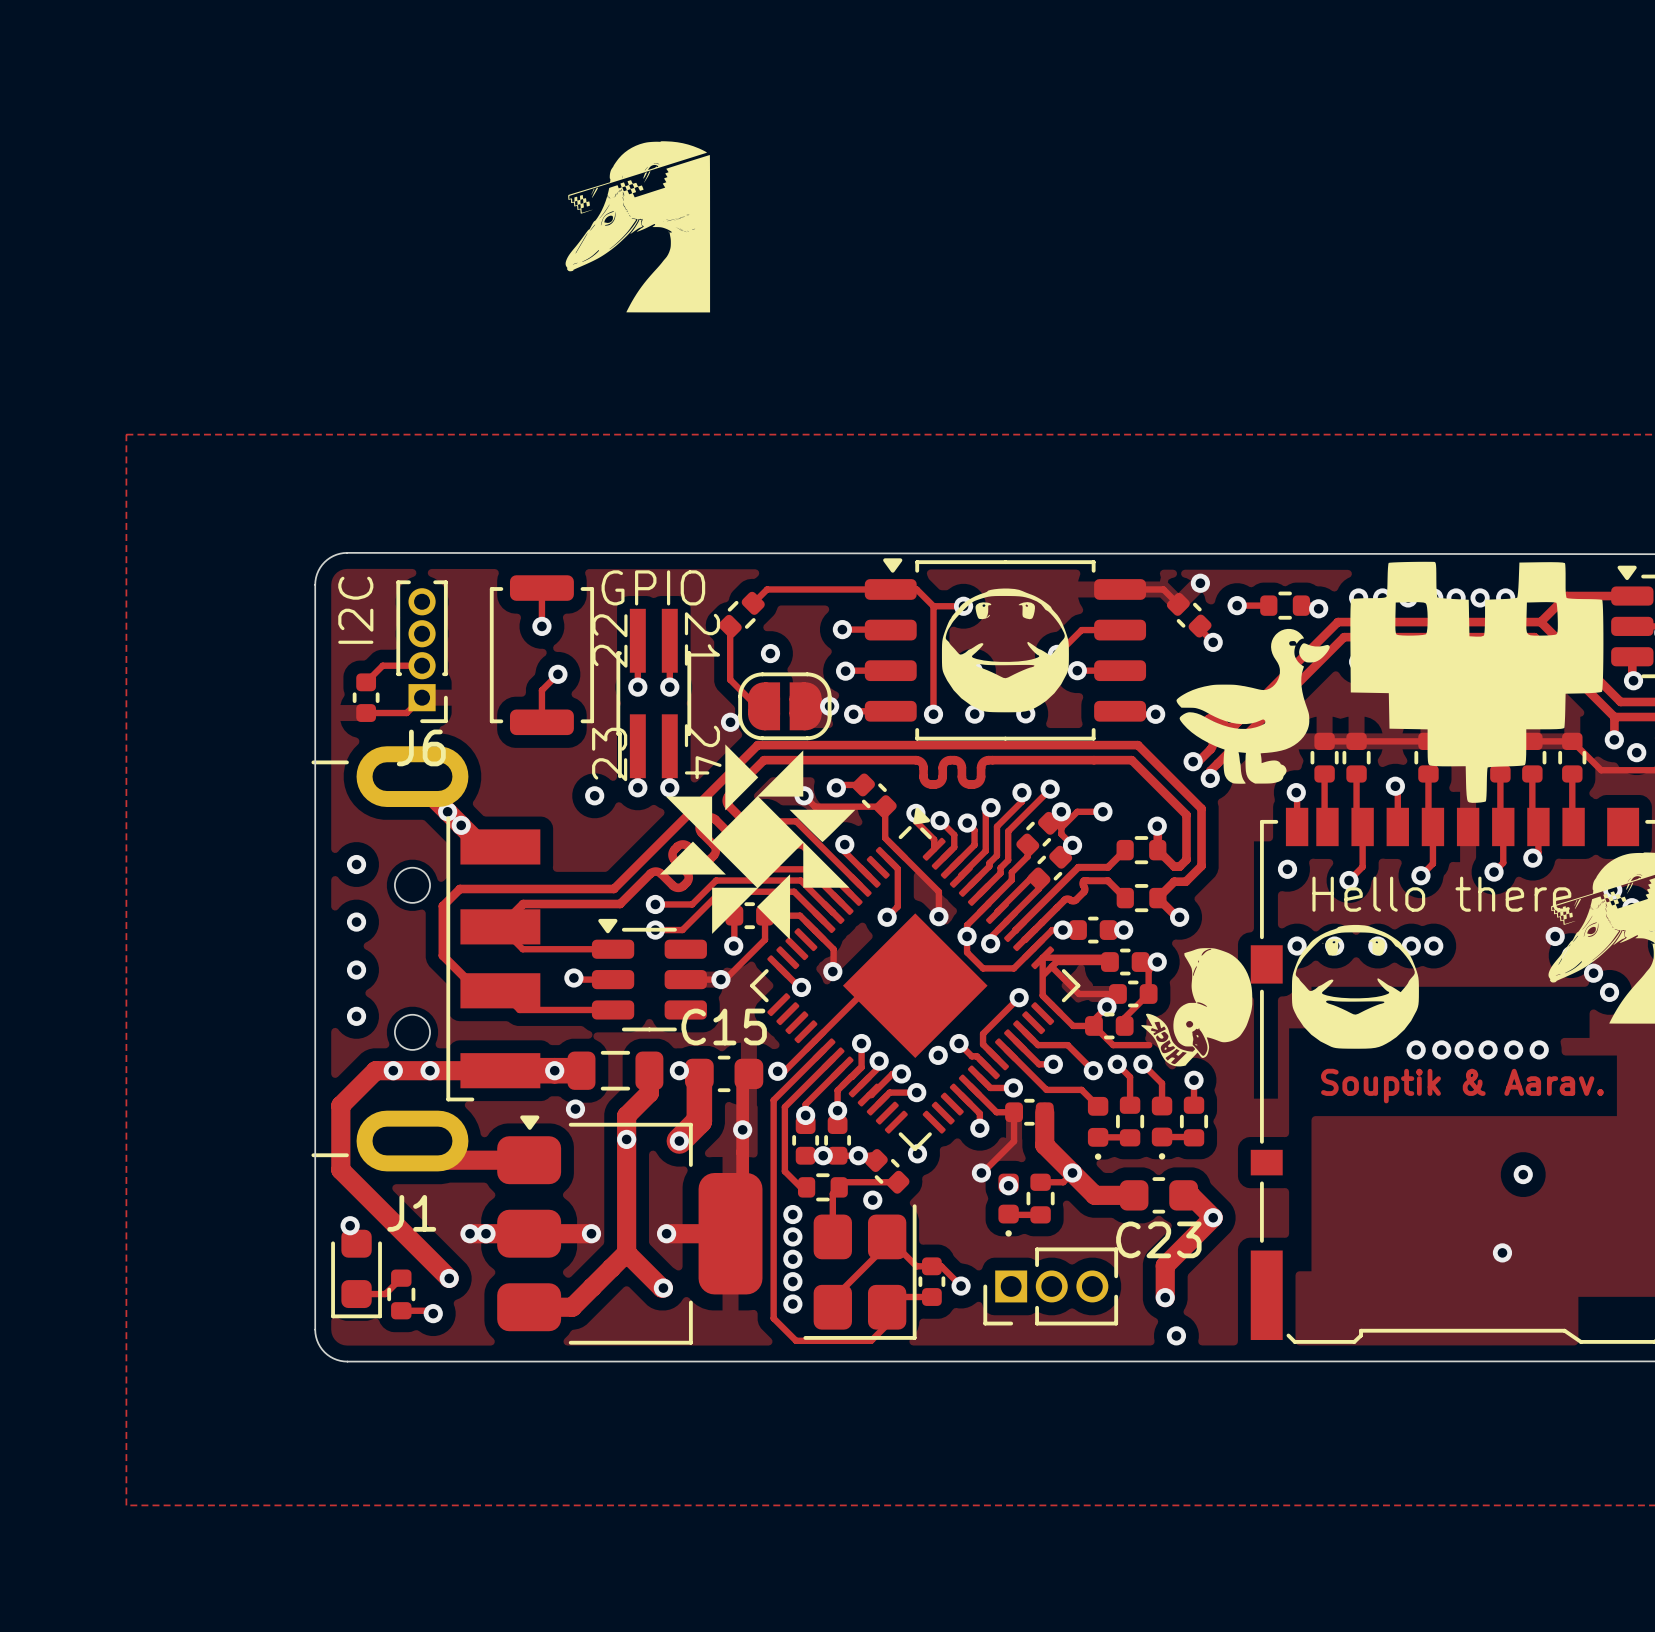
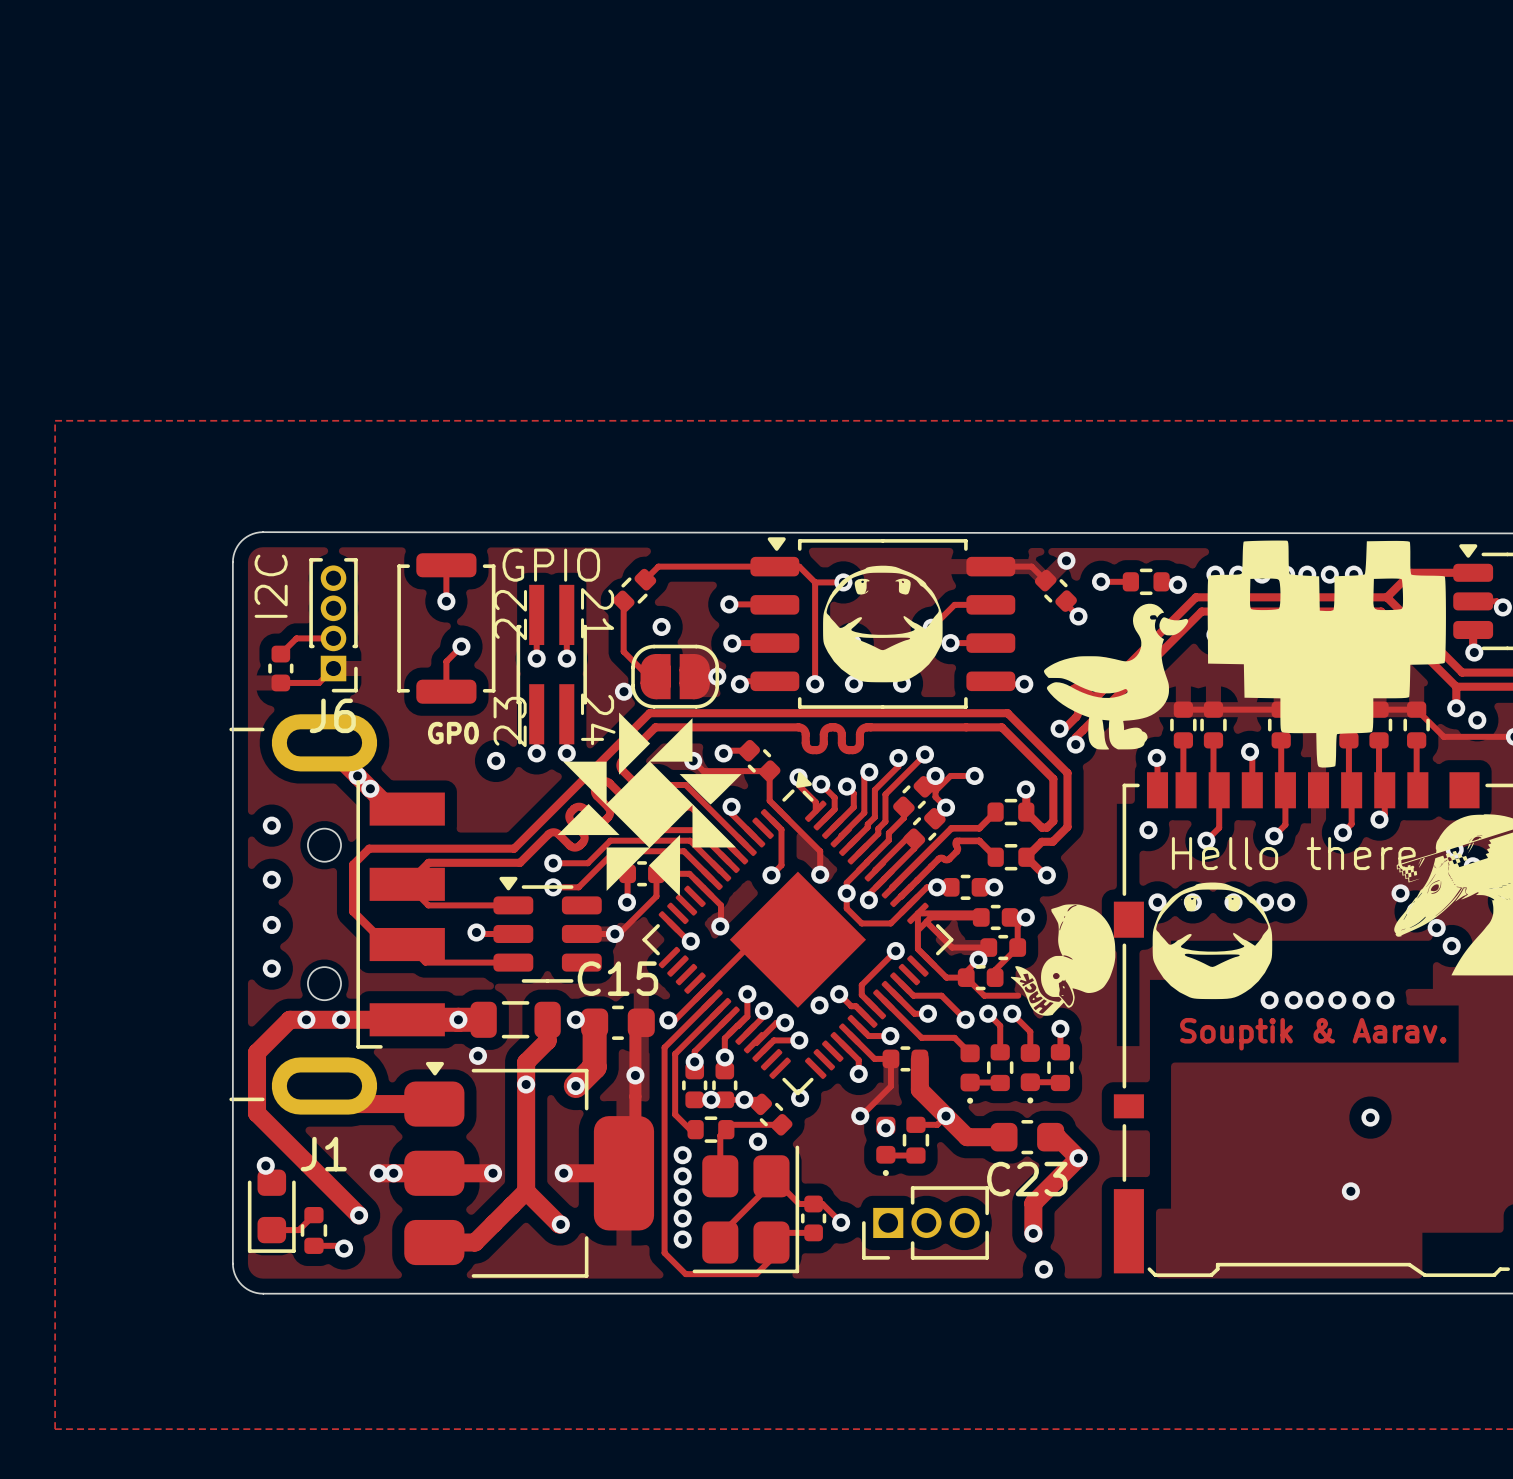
drawing: [565, 141, 711, 313] -> none
text: none -> GP0 (453, 733)

